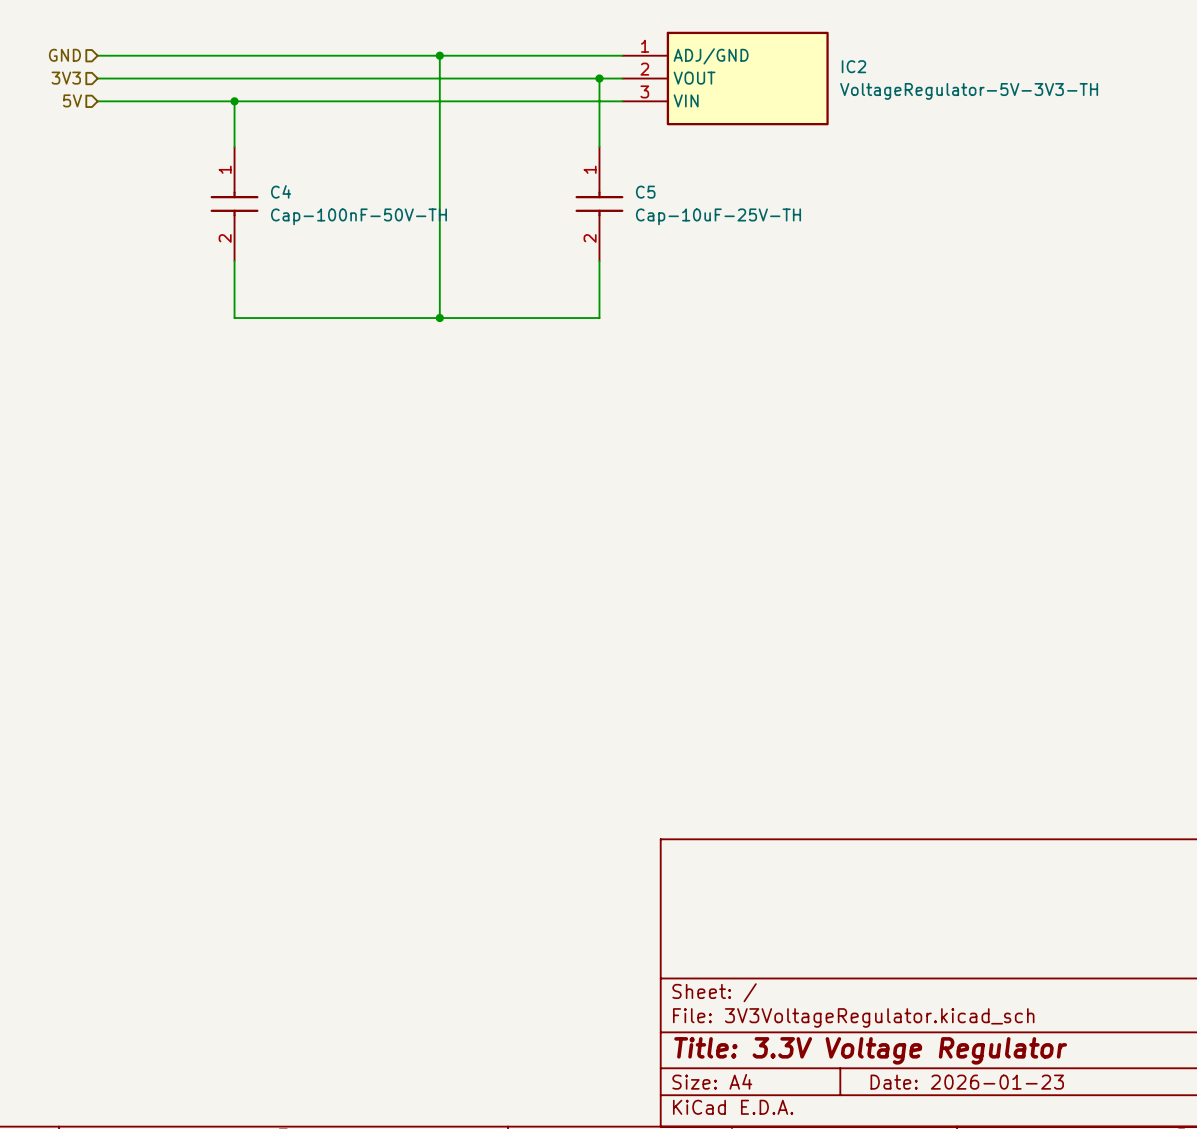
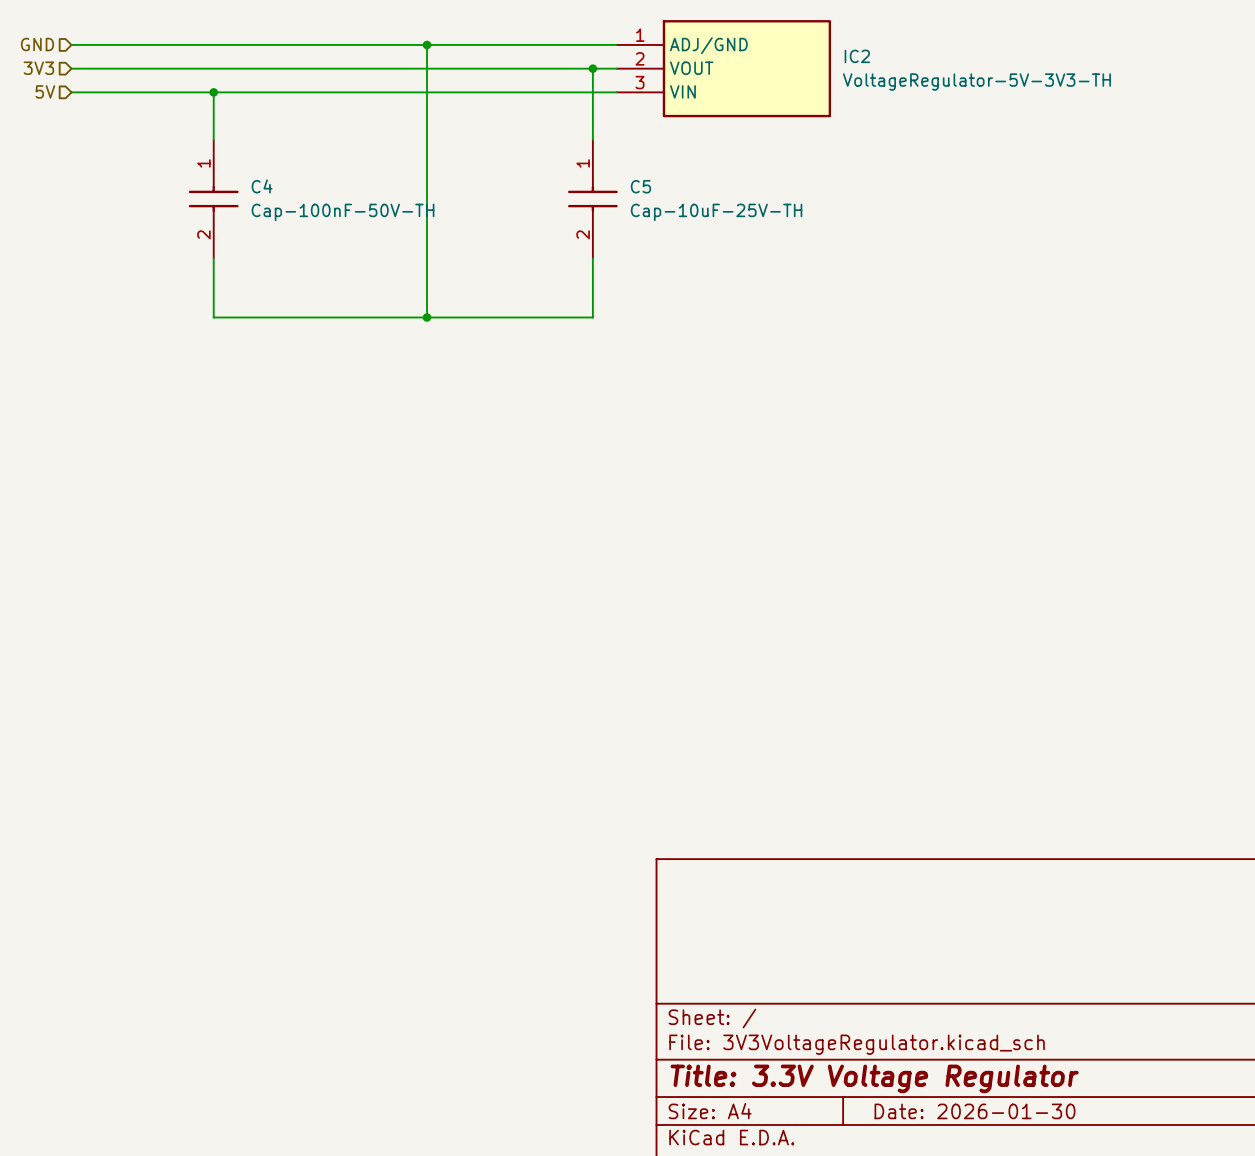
title block: Date: 2026-01-23 (967, 1082) -> Date: 2026-01-30 (975, 1111)

